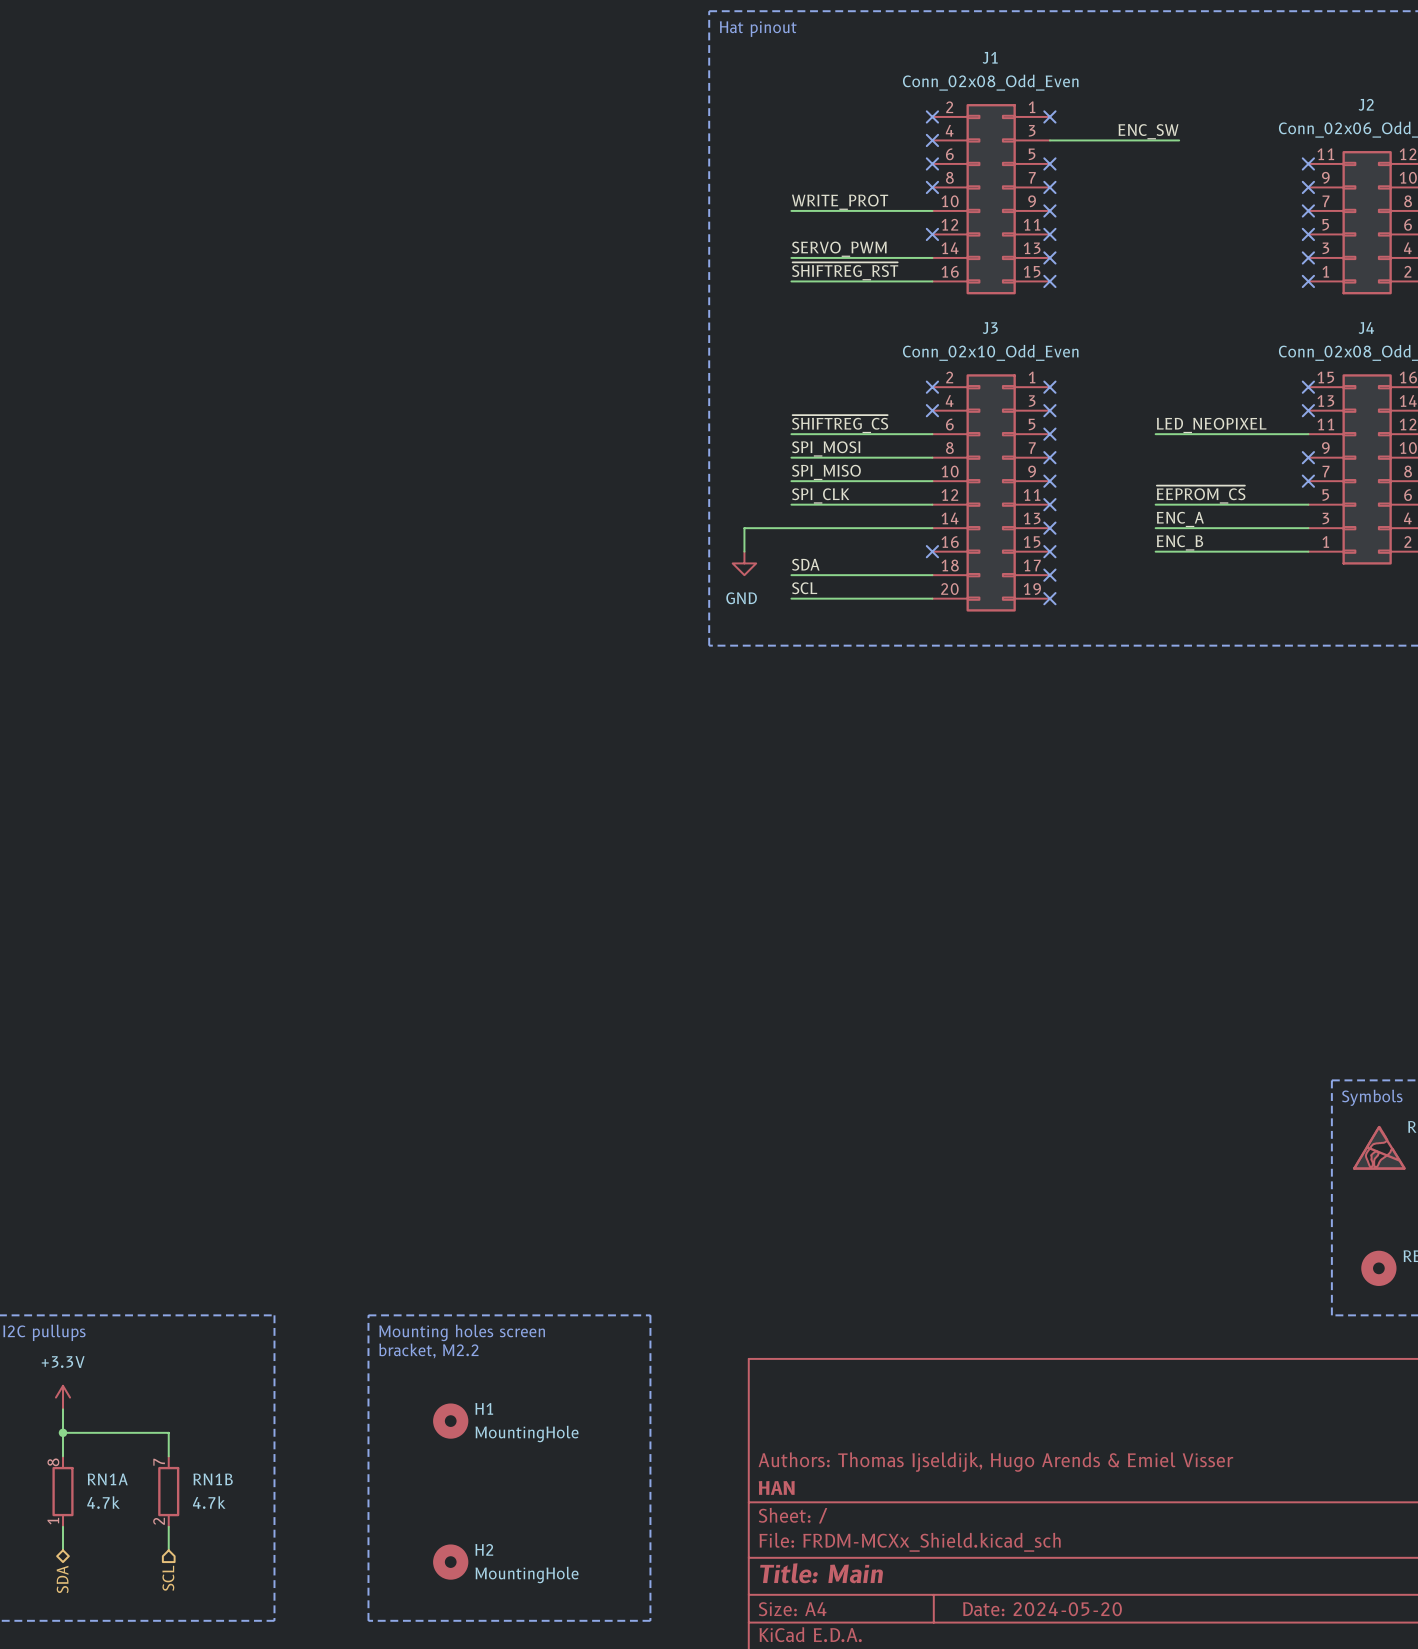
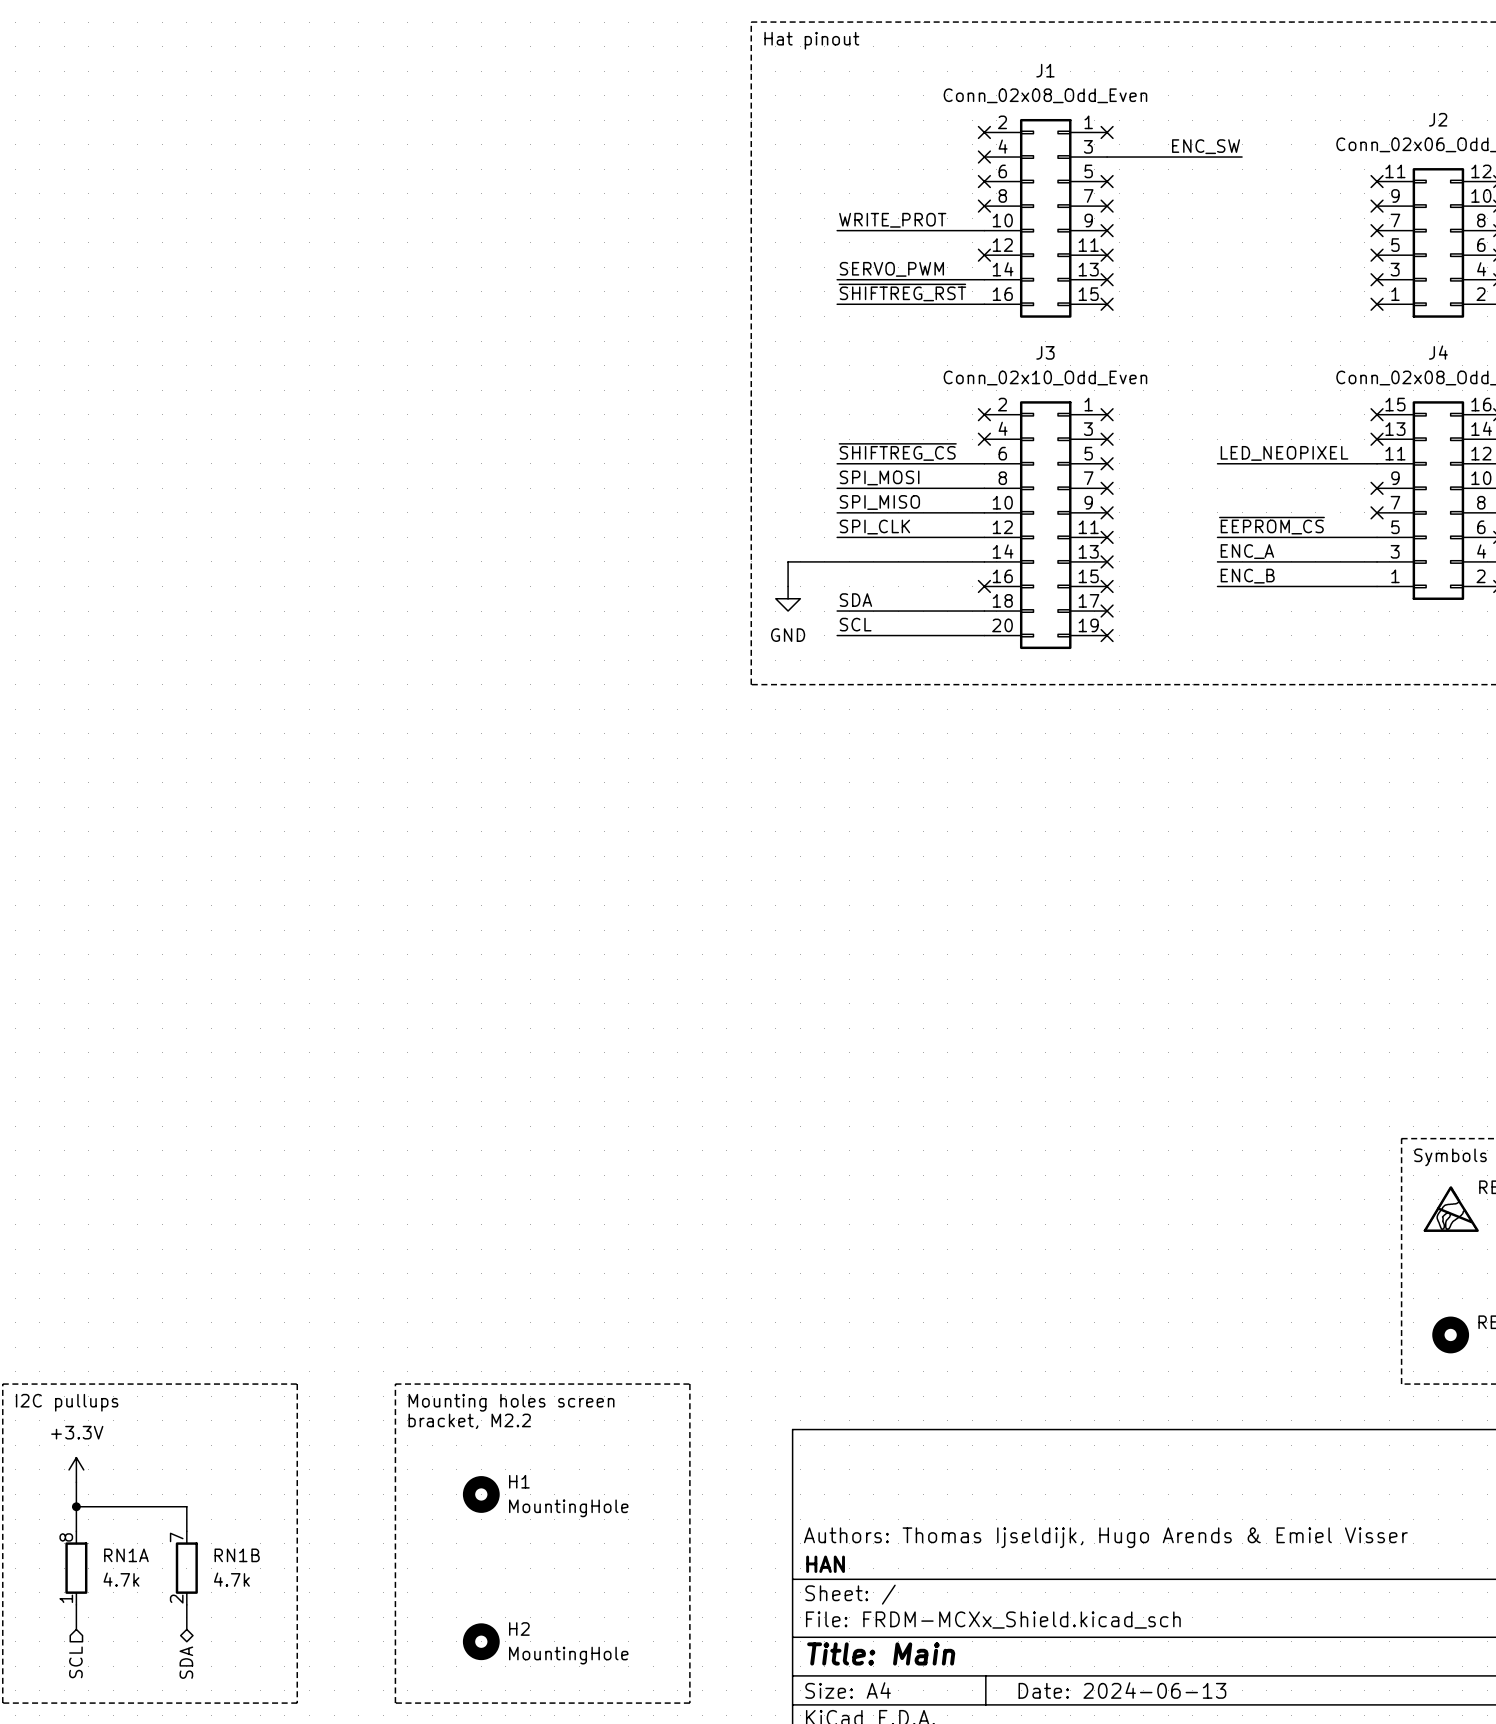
hierarchical label shape: input (168, 1578) -> bidirectional (186, 1662)
hierarchical label: SCL (168, 1578) -> SDA (186, 1662)
hierarchical label shape: bidirectional (62, 1579) -> input (75, 1662)
hierarchical label: SDA (62, 1579) -> SCL (75, 1662)
title block: Date: 2024-05-20 (1042, 1609) -> Date: 2024-06-13 (1122, 1690)

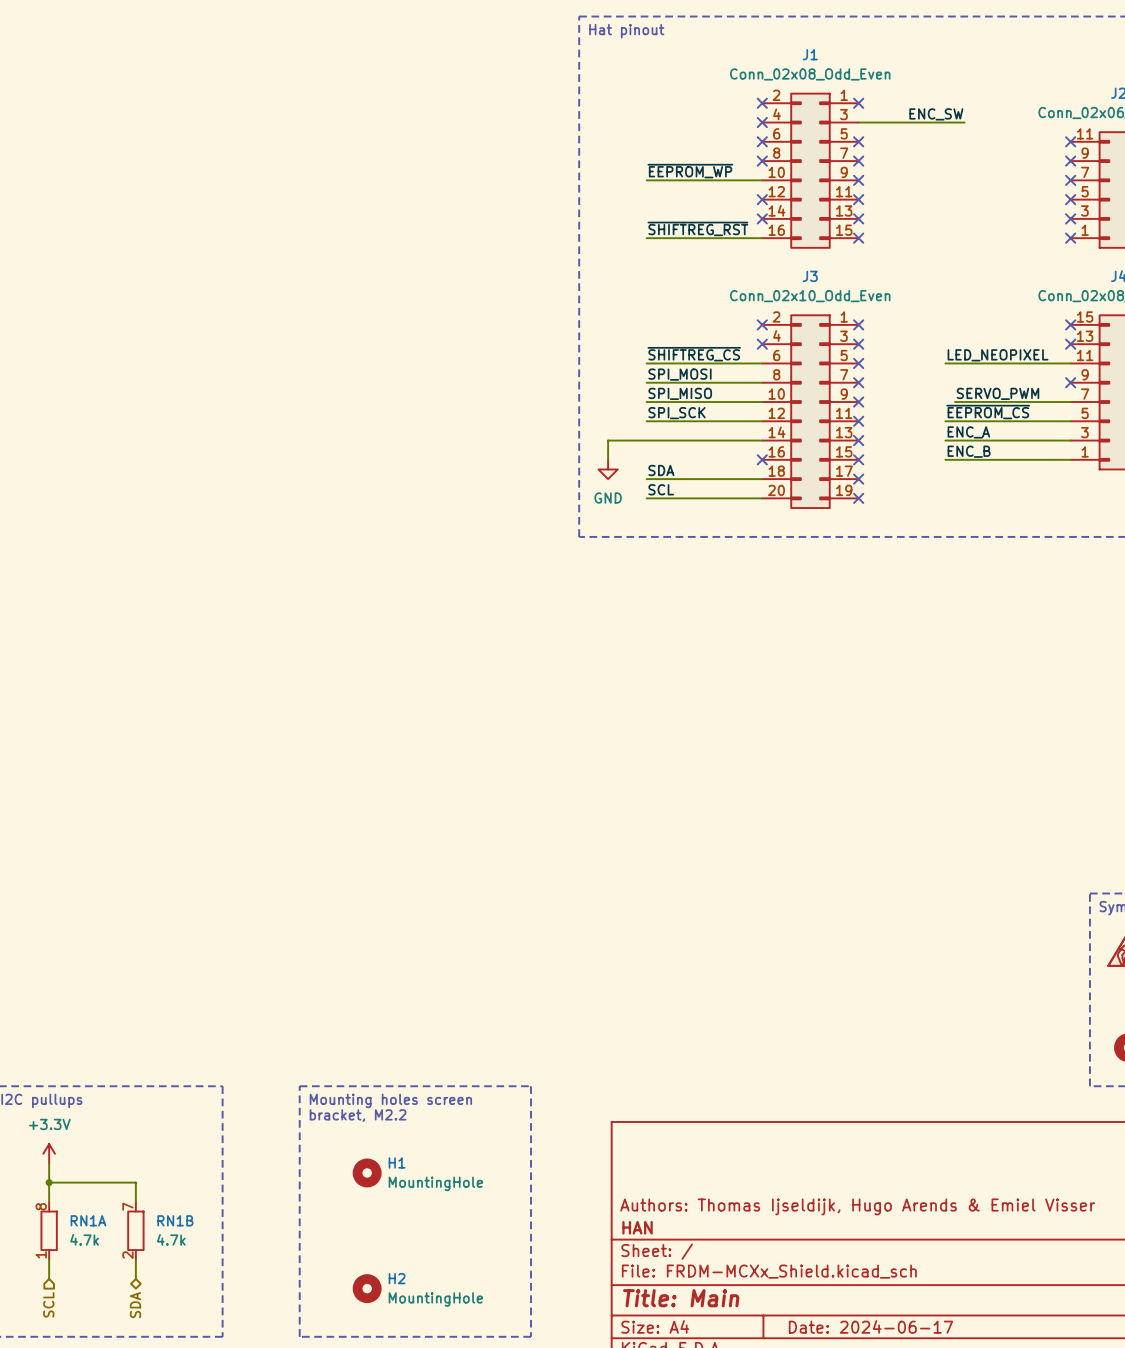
label: WRITE_PROT (892, 220) -> ~{EEPROM_WP} (690, 171)
label: SERVO_PWM (891, 269) -> none
wire: (837, 279) (984, 279) -> none
no-connect mark: none -> (762, 218)
label: none -> SERVO_PWM (998, 393)
wire: none -> (955, 402) (1070, 402)
no-connect mark: (1377, 512) -> none
label: SPI_CLK (874, 527) -> SPI_SCK (677, 413)
title block: Date: 2024-06-13 (1122, 1690) -> Date: 2024-06-17 (870, 1326)

